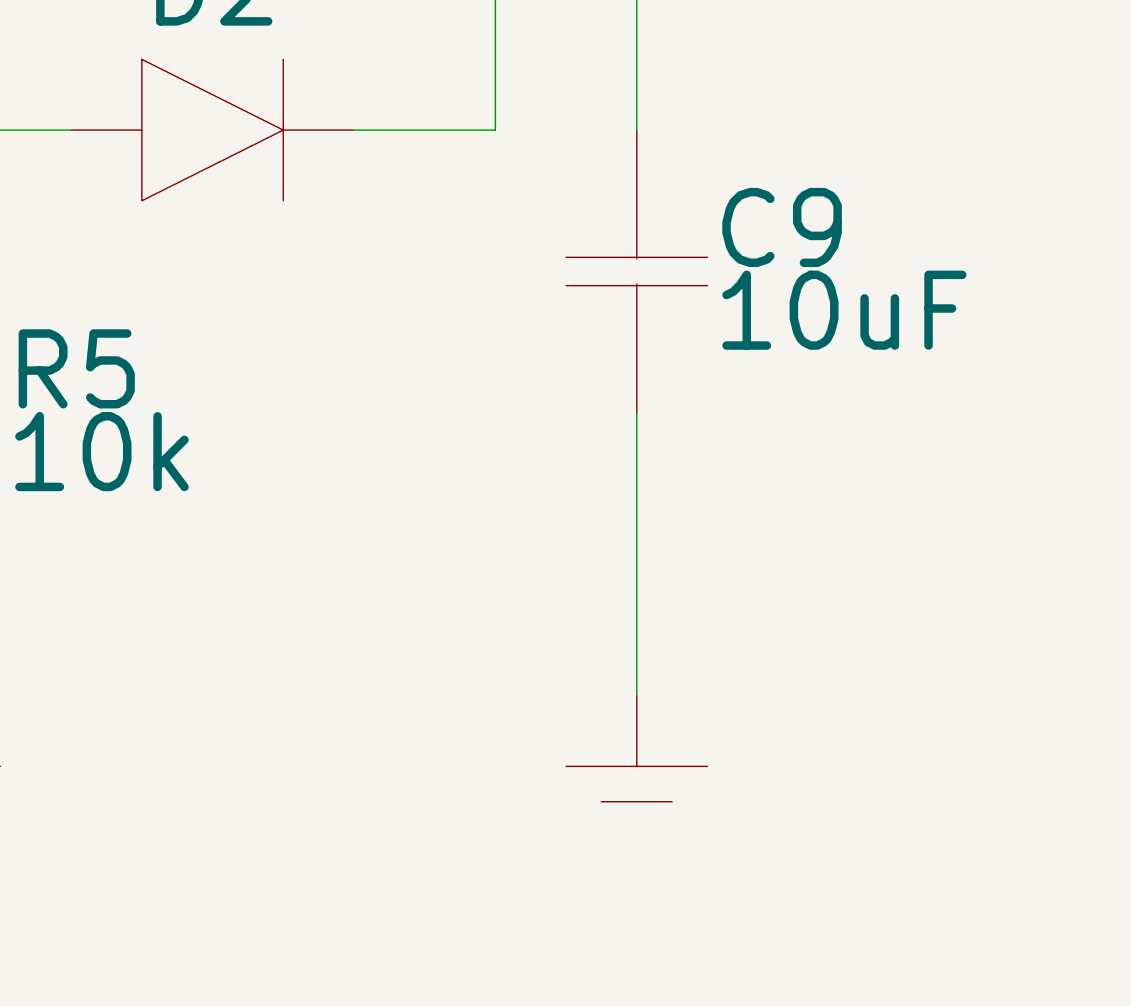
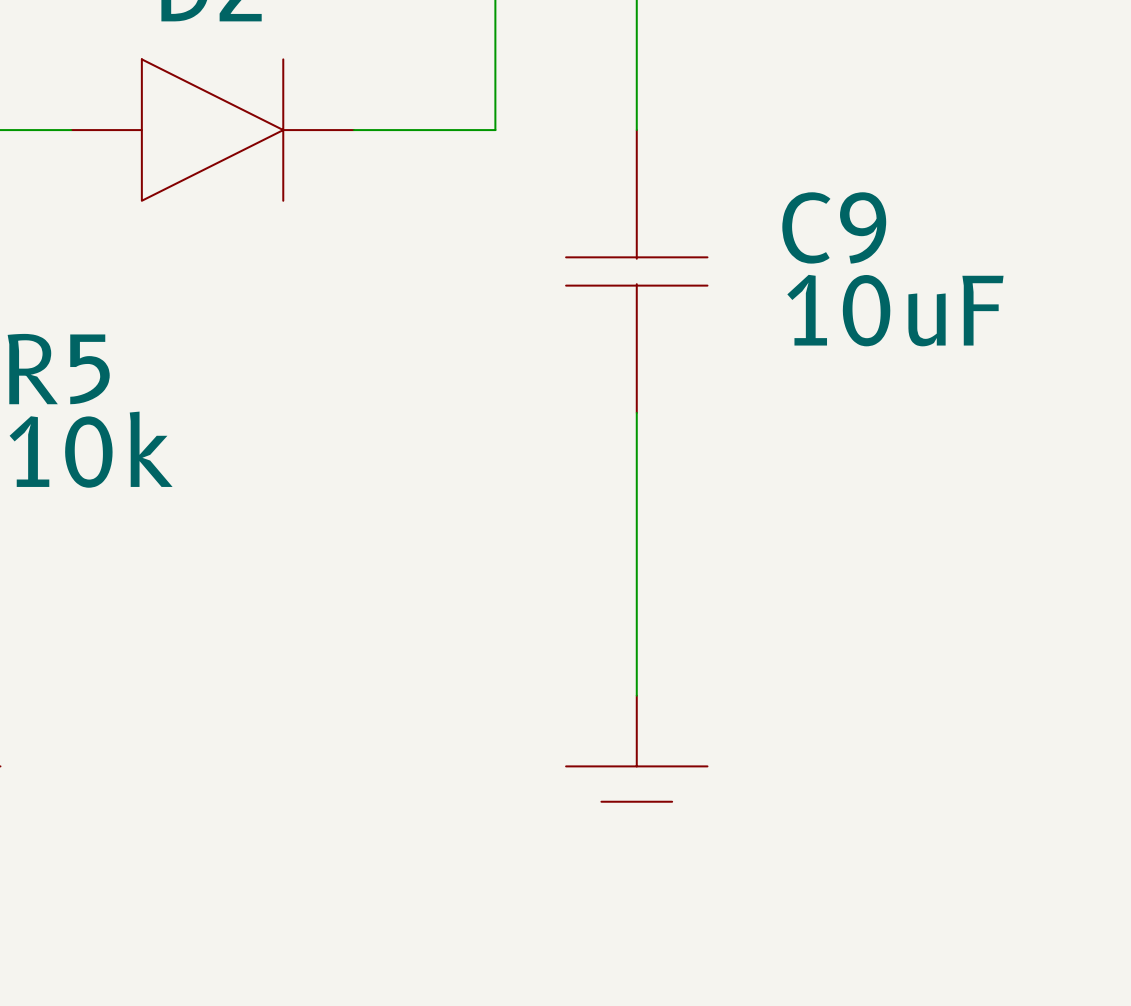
C9 name position: C9 (782, 227) -> C9 (834, 227)
C9 value position: 10uF (844, 310) -> 10uF (895, 310)

